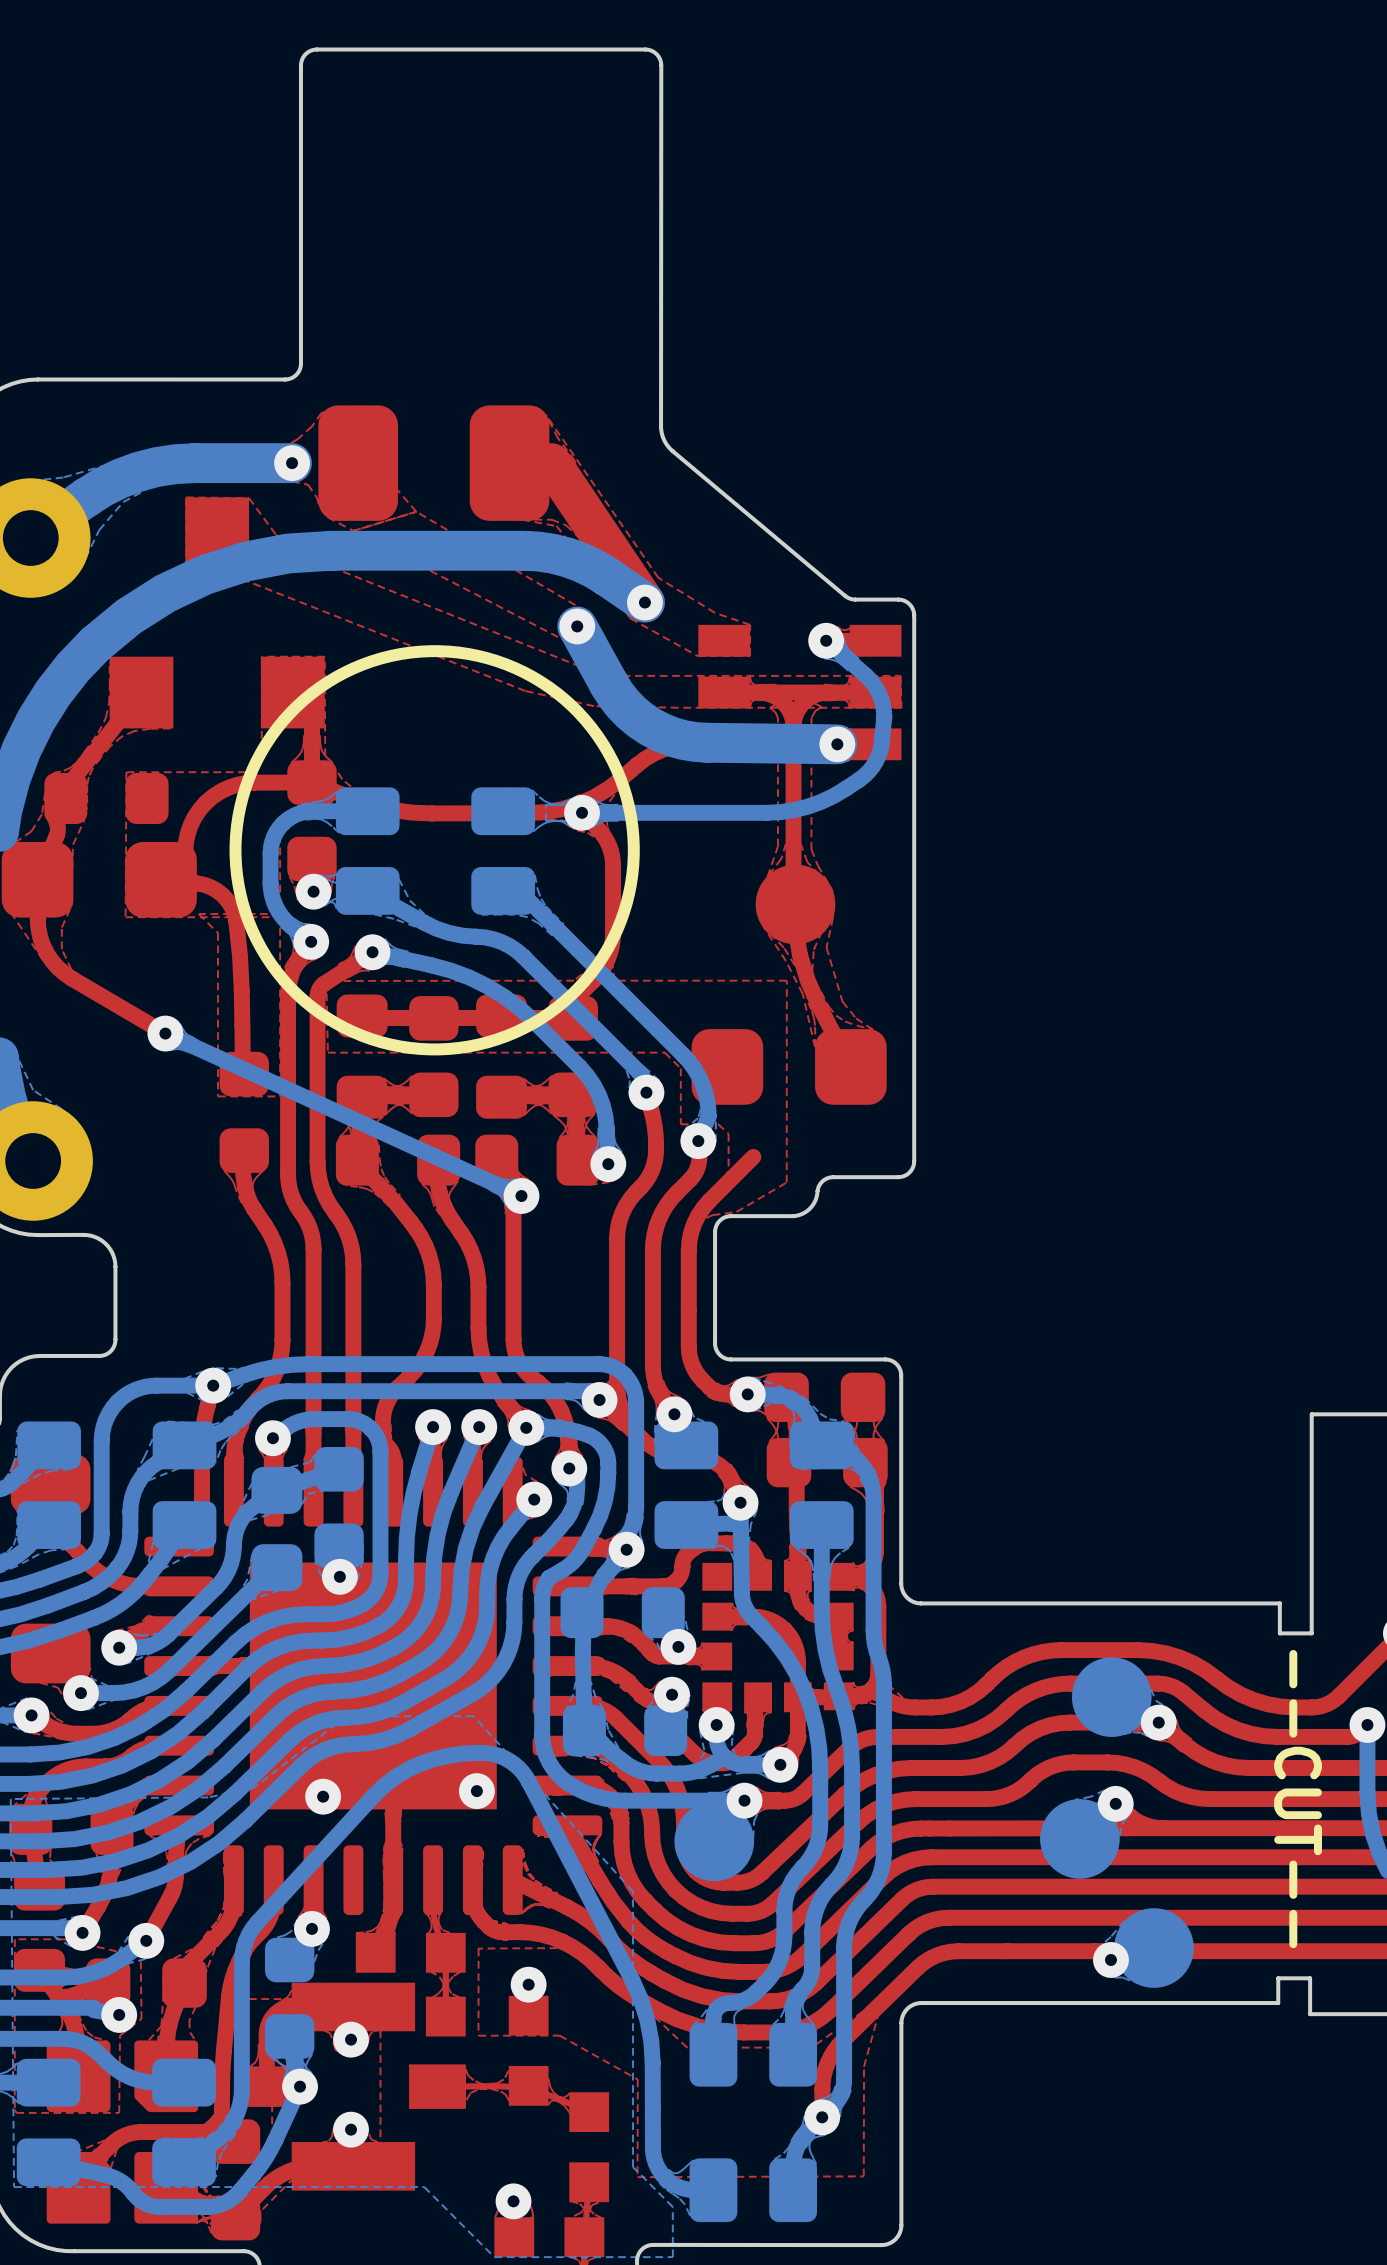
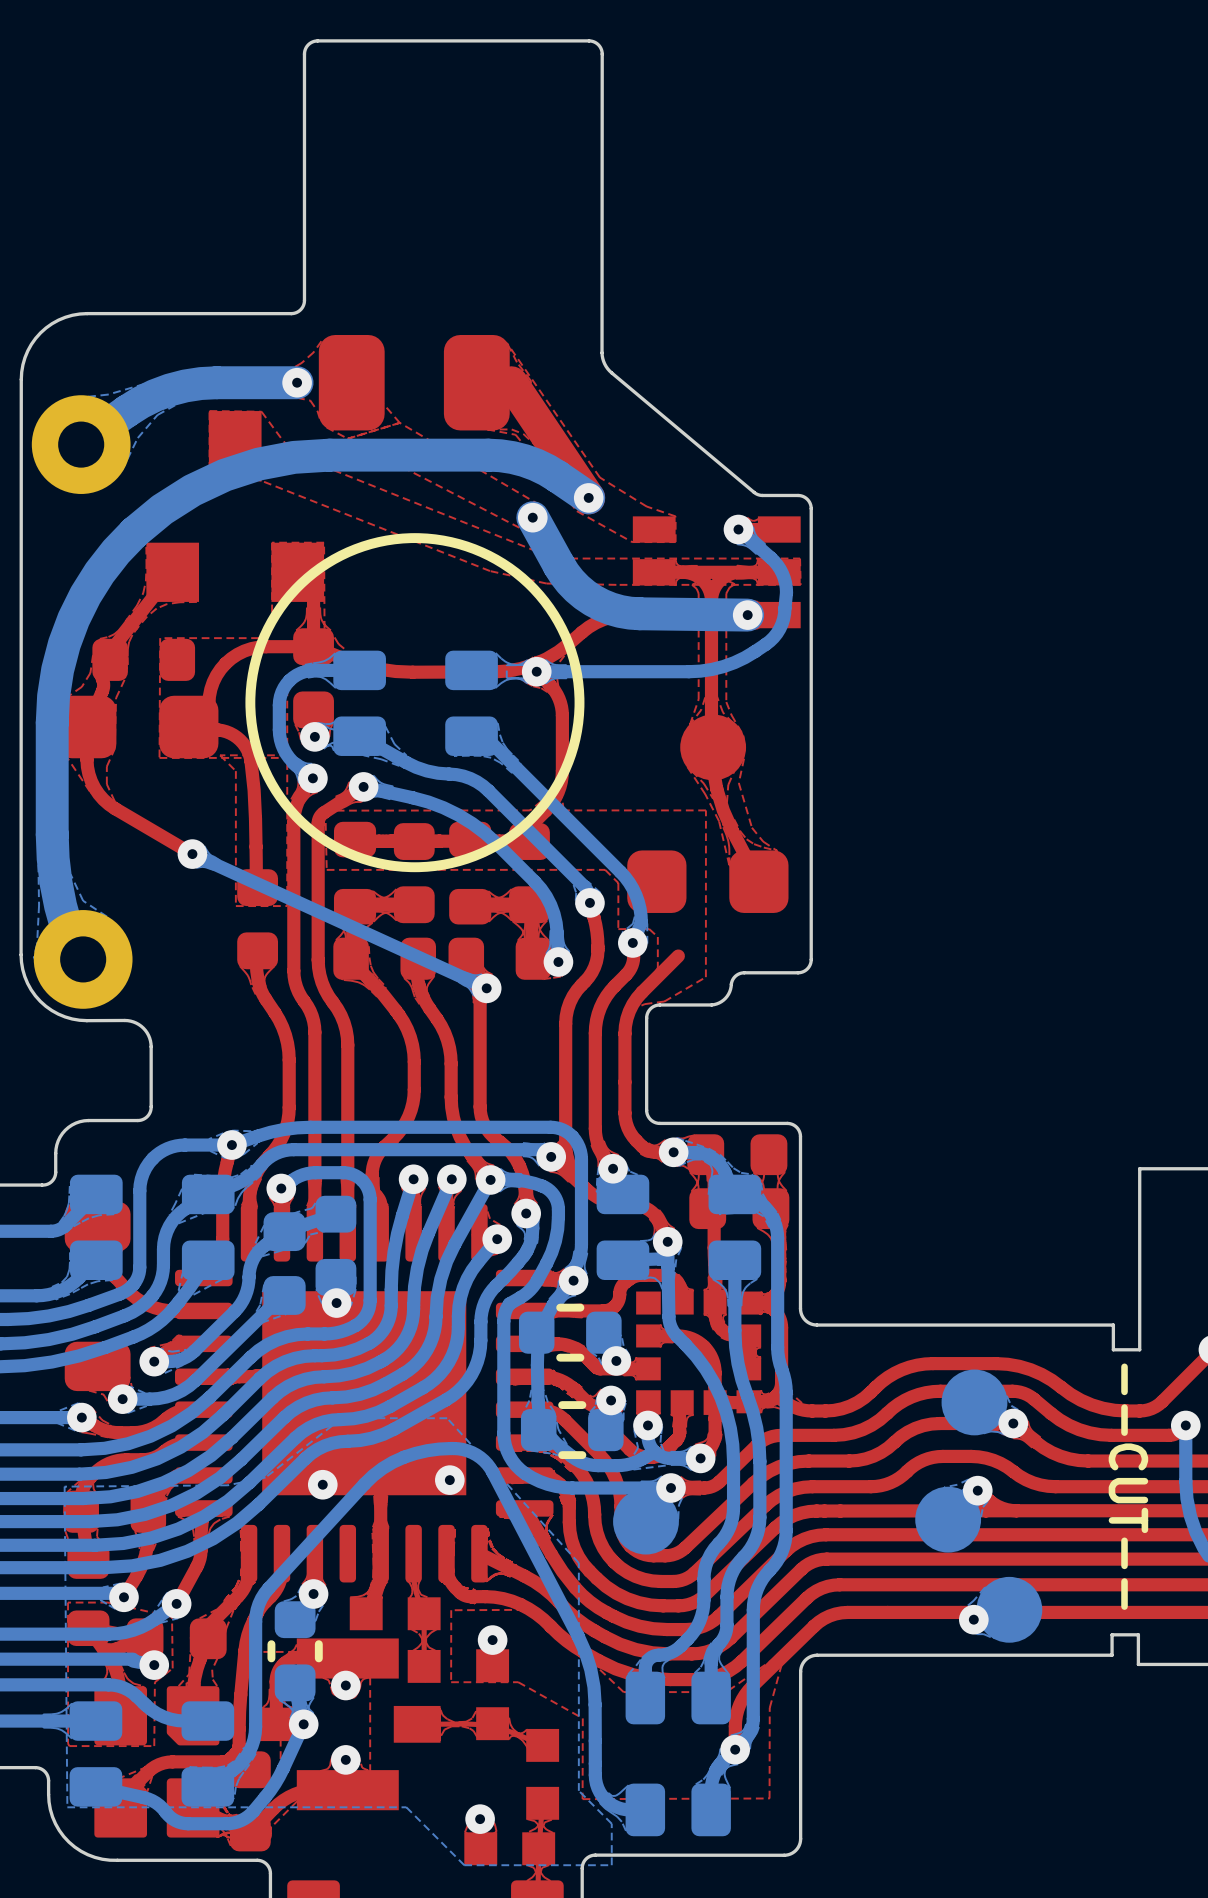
part footprint: [560, 1587, 685, 1639] -> [518, 1303, 622, 1362]
part footprint: [562, 1705, 688, 1757] -> [520, 1401, 624, 1460]
part footprint: [264, 1937, 315, 2059] -> [267, 1601, 323, 1702]

